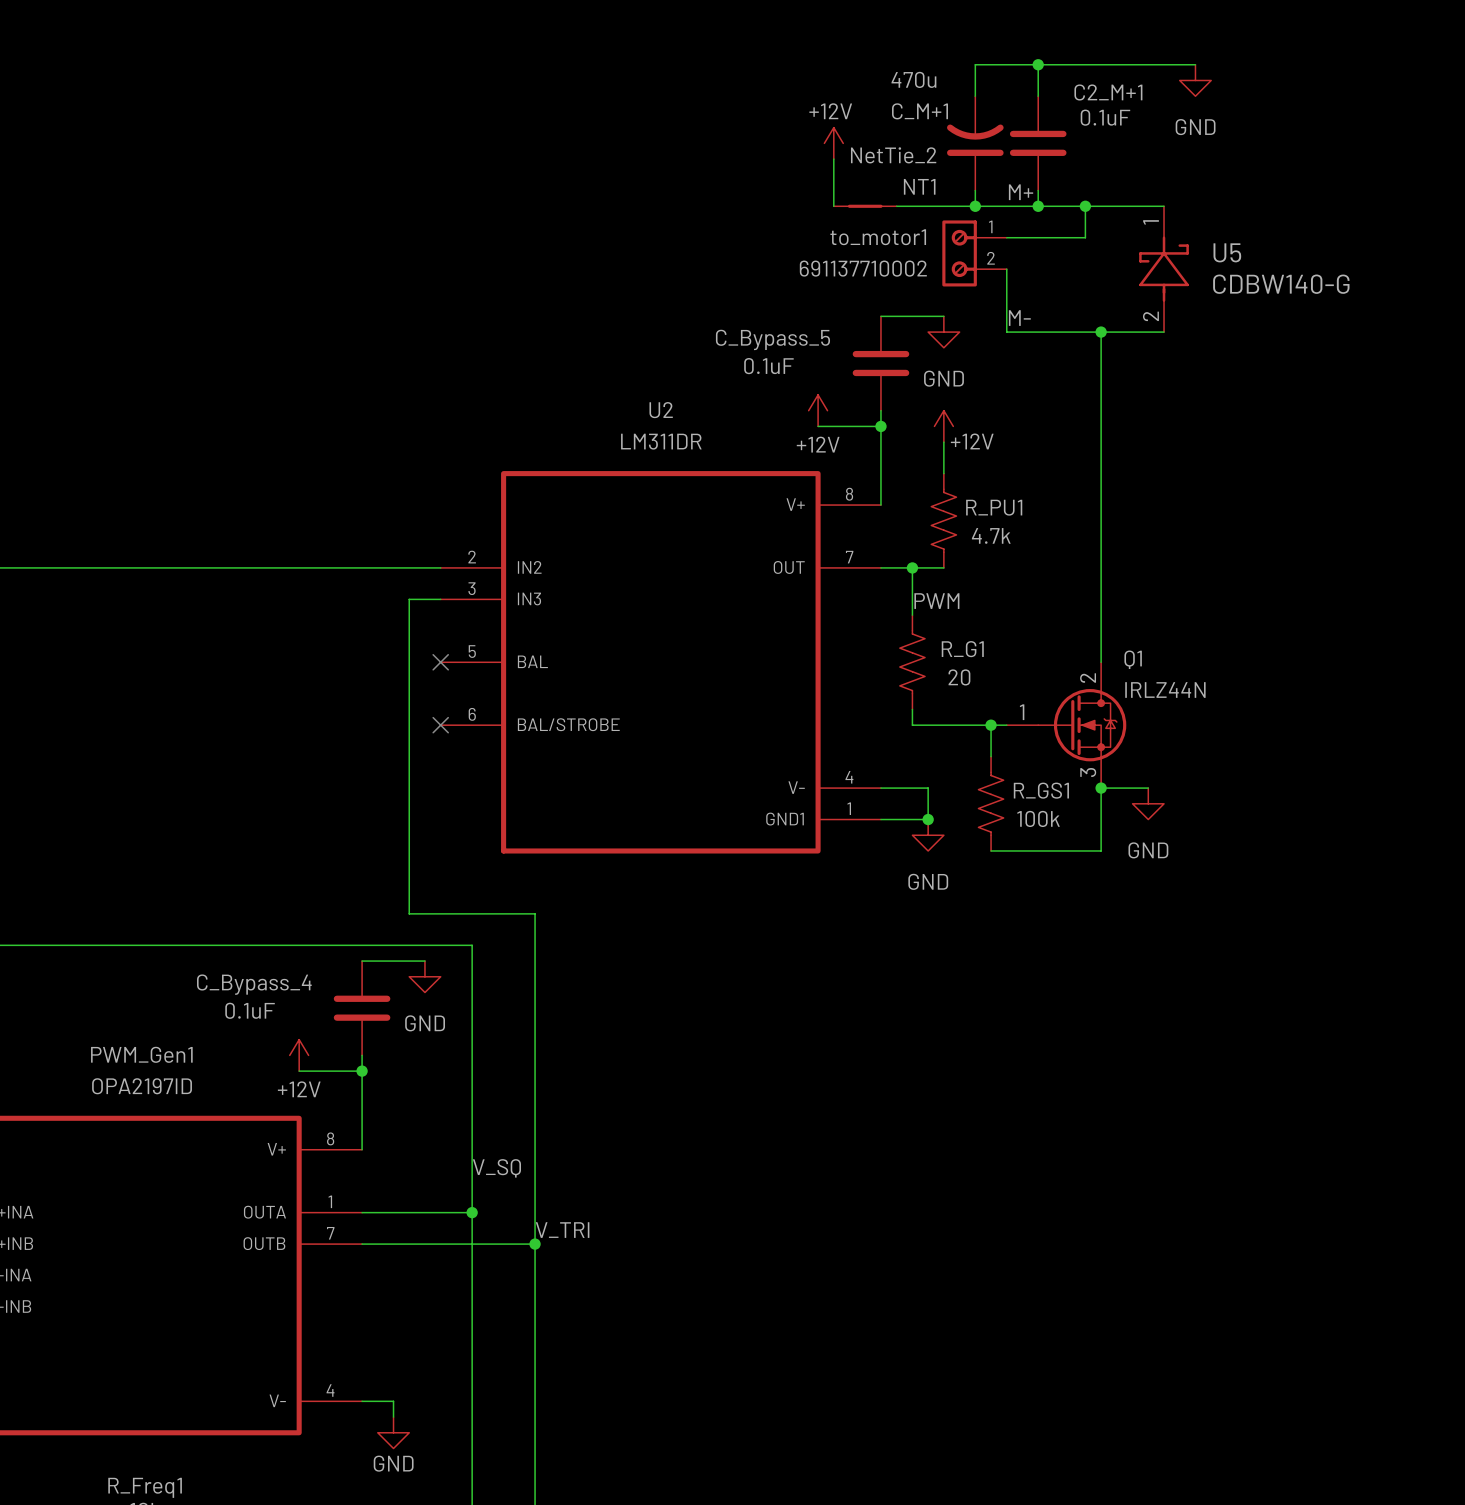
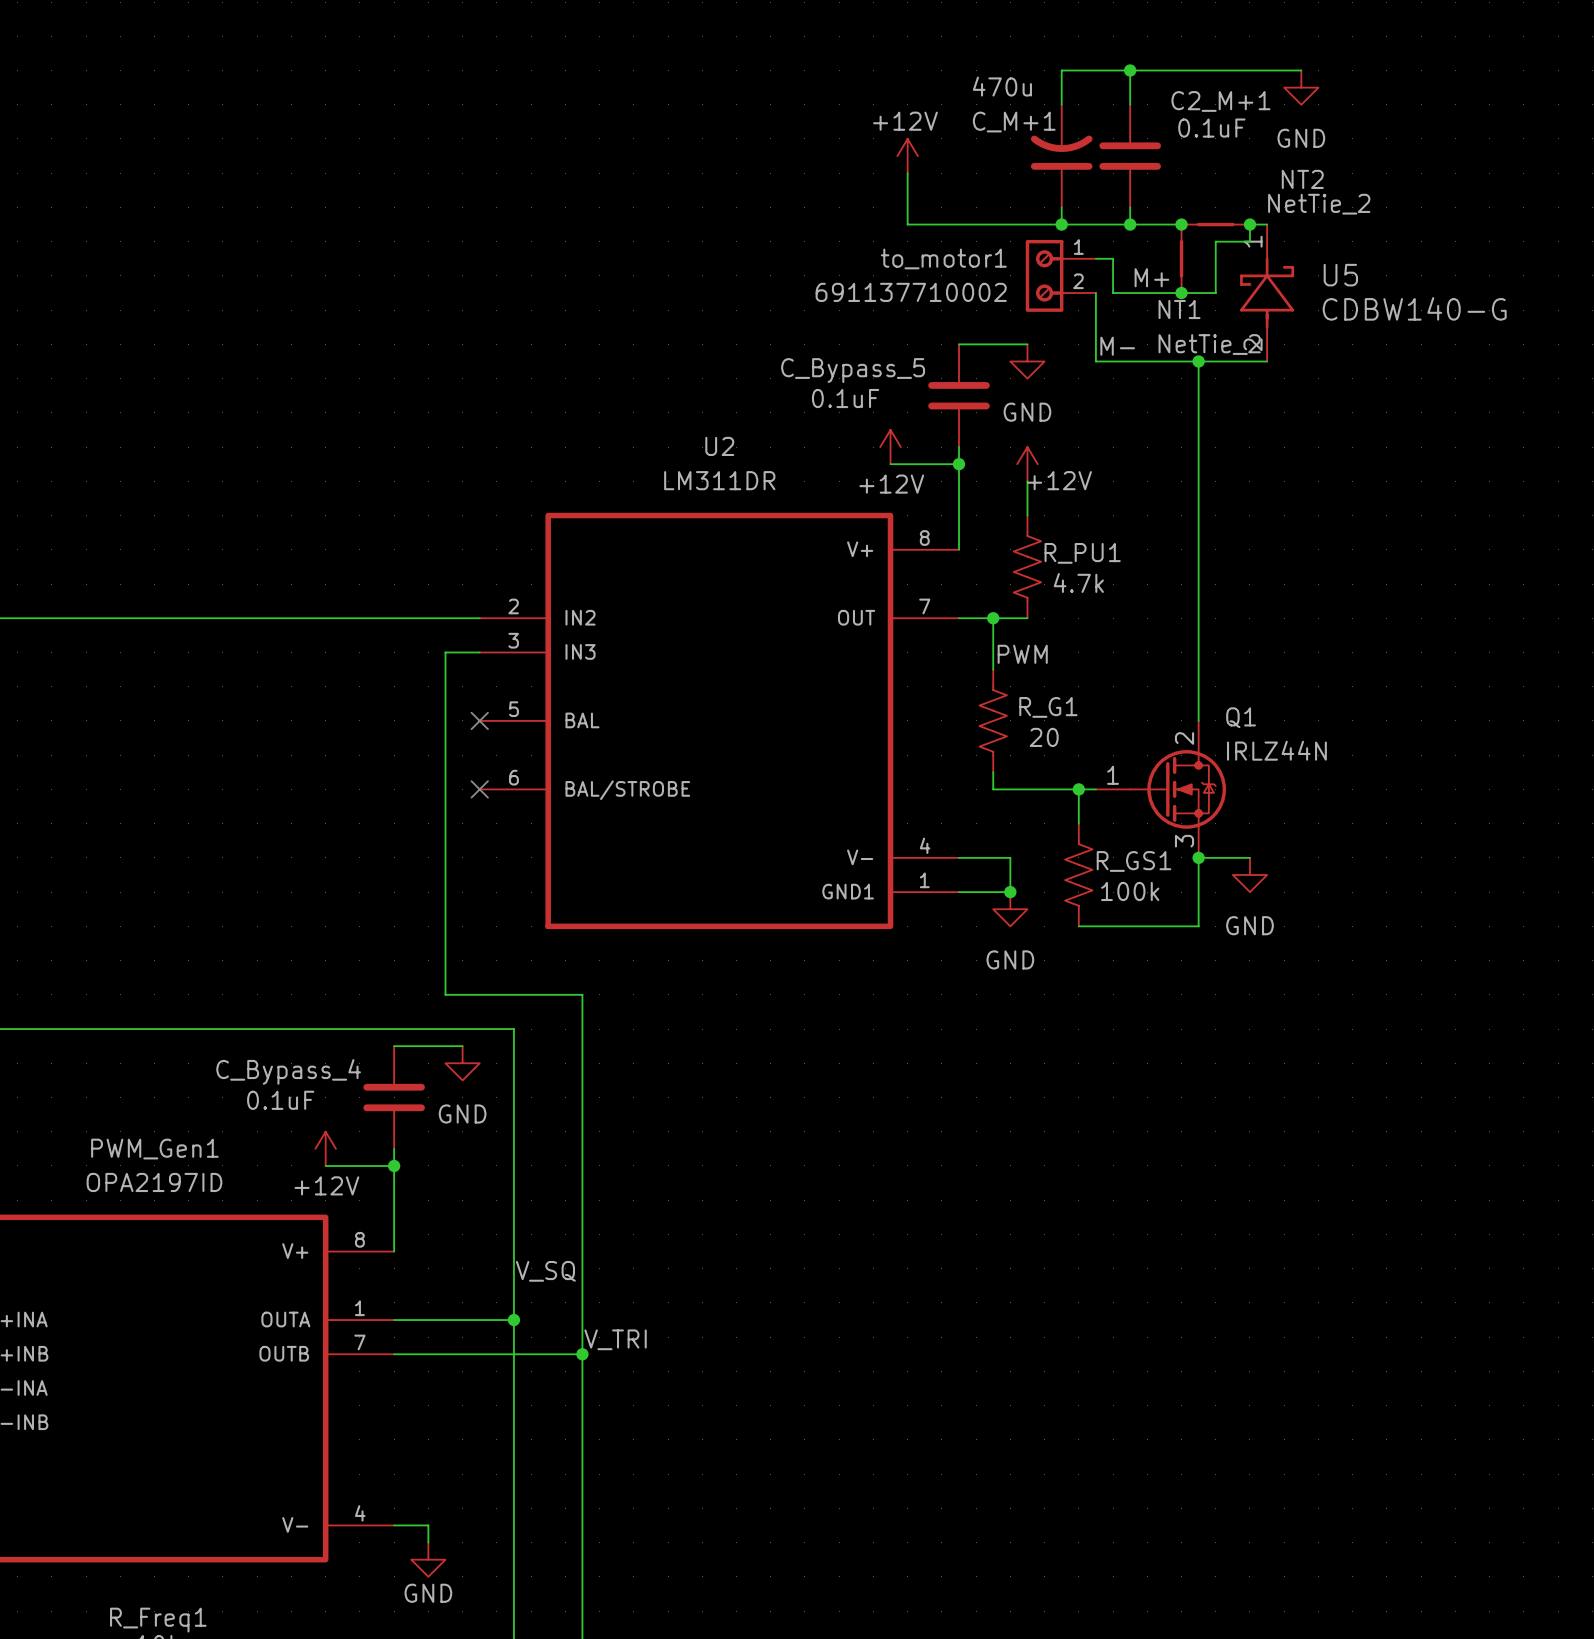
NT1 value position: NetTie_2 (893, 155) -> NetTie_2 (1209, 344)
label position: M+ (1021, 192) -> M+ (1151, 277)
NT1 rotation: 0° (865, 206) -> 90° clockwise (1181, 258)
NT1 position: (865, 206) -> (1181, 258)
NT2: none -> NetTie_2 (1215, 224)
wire: (1148, 206) (1085, 206) (1085, 237) (1022, 237) -> (1249, 224) (1249, 241) (1215, 241) (1215, 293) (1113, 293) (1113, 258)
junction: none -> (1249, 224)
junction: none -> (1181, 293)

